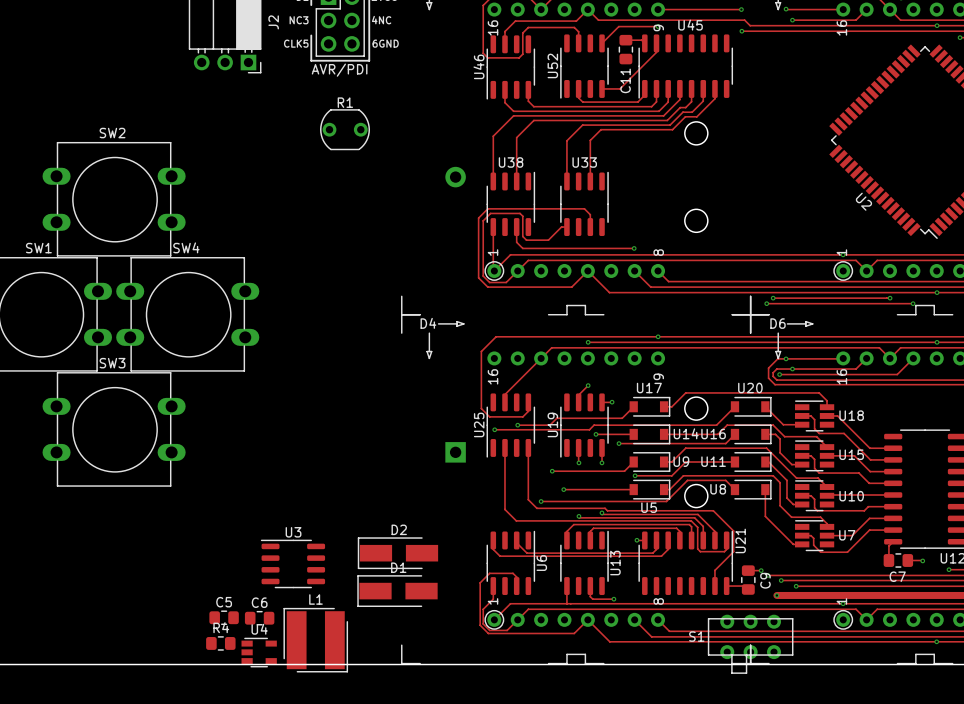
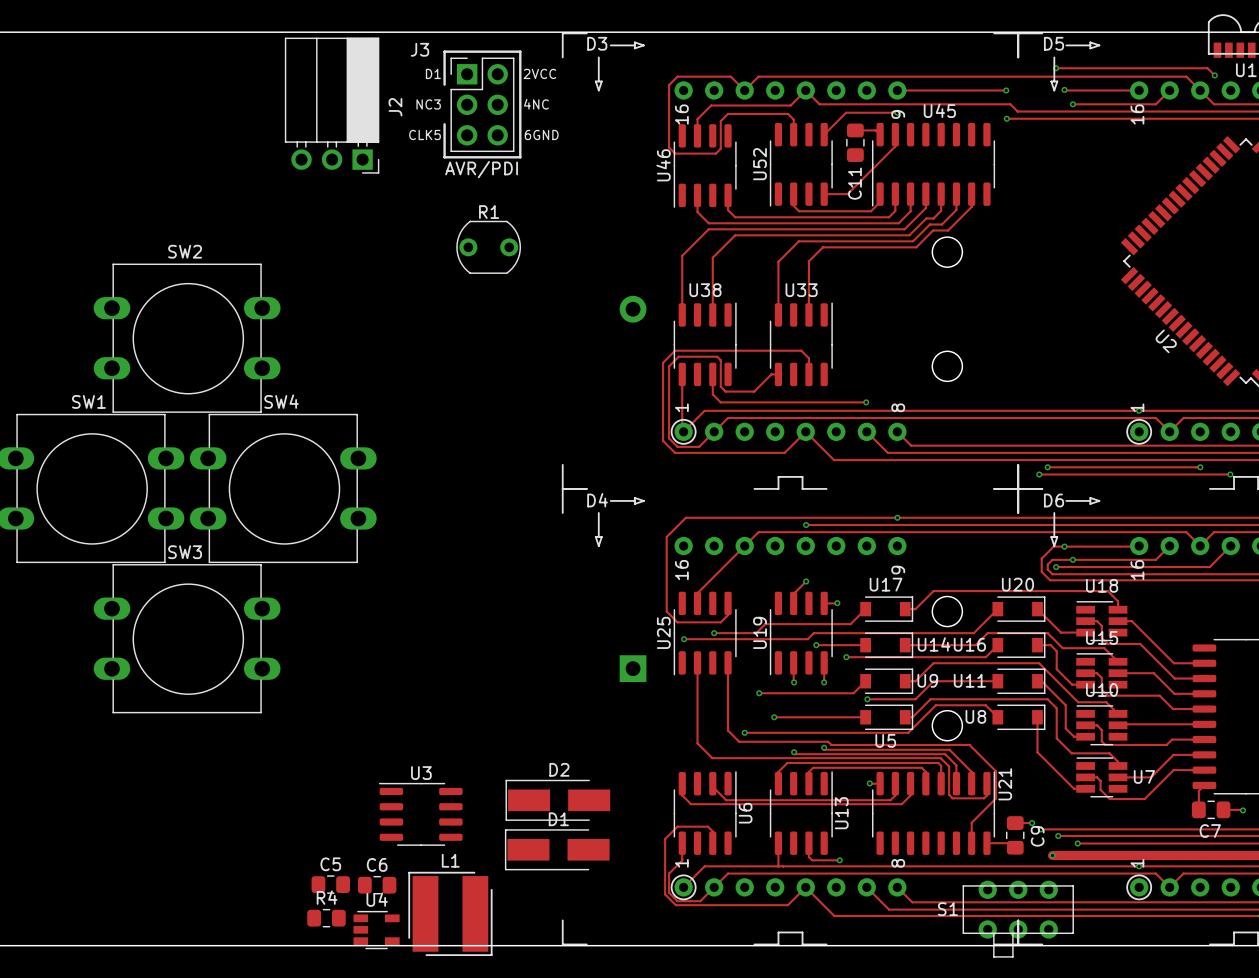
U18 name position: U18 (851, 415) -> U18 (1102, 585)
U15 name position: U15 (851, 454) -> U15 (1102, 637)
U10 name position: U10 (851, 496) -> U10 (1102, 690)

